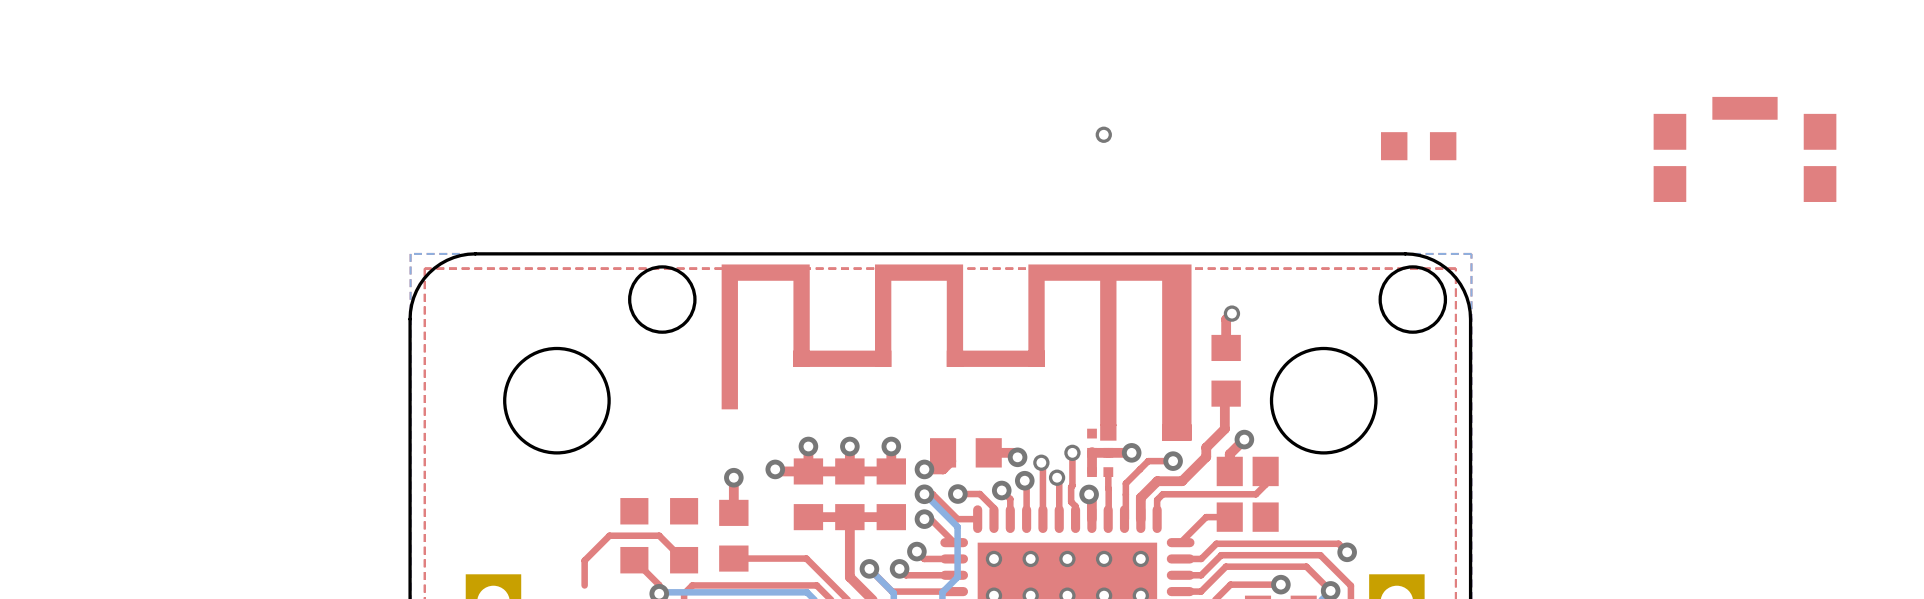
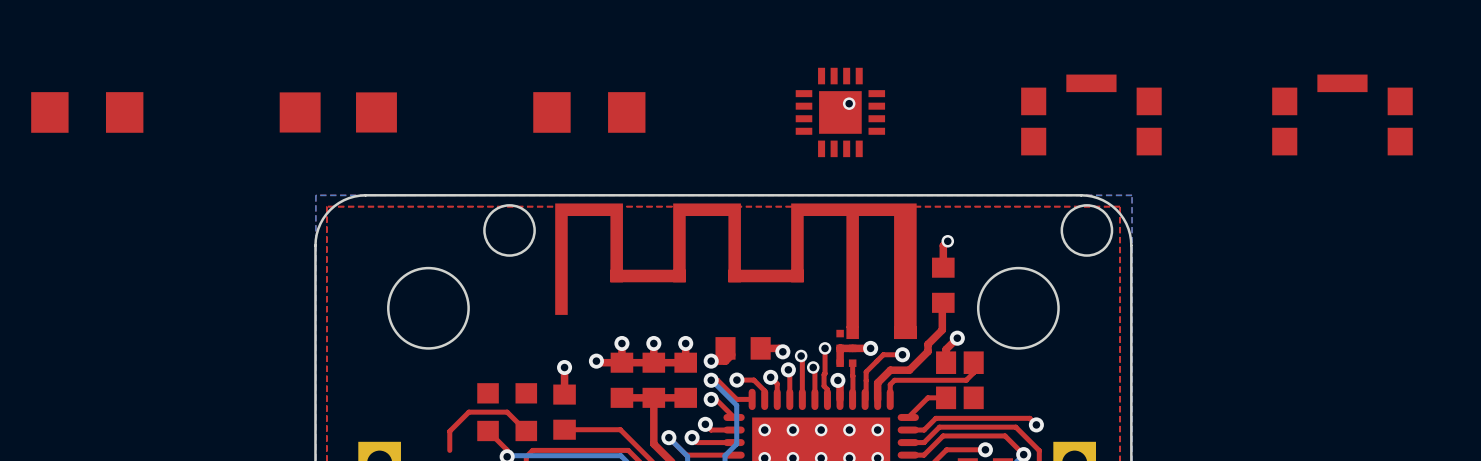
part footprint: [1380, 132, 1457, 161] -> [1021, 74, 1162, 156]
part: none -> (87, 112)
part: none -> (338, 112)
part: none -> (589, 112)
part: none -> (840, 112)

